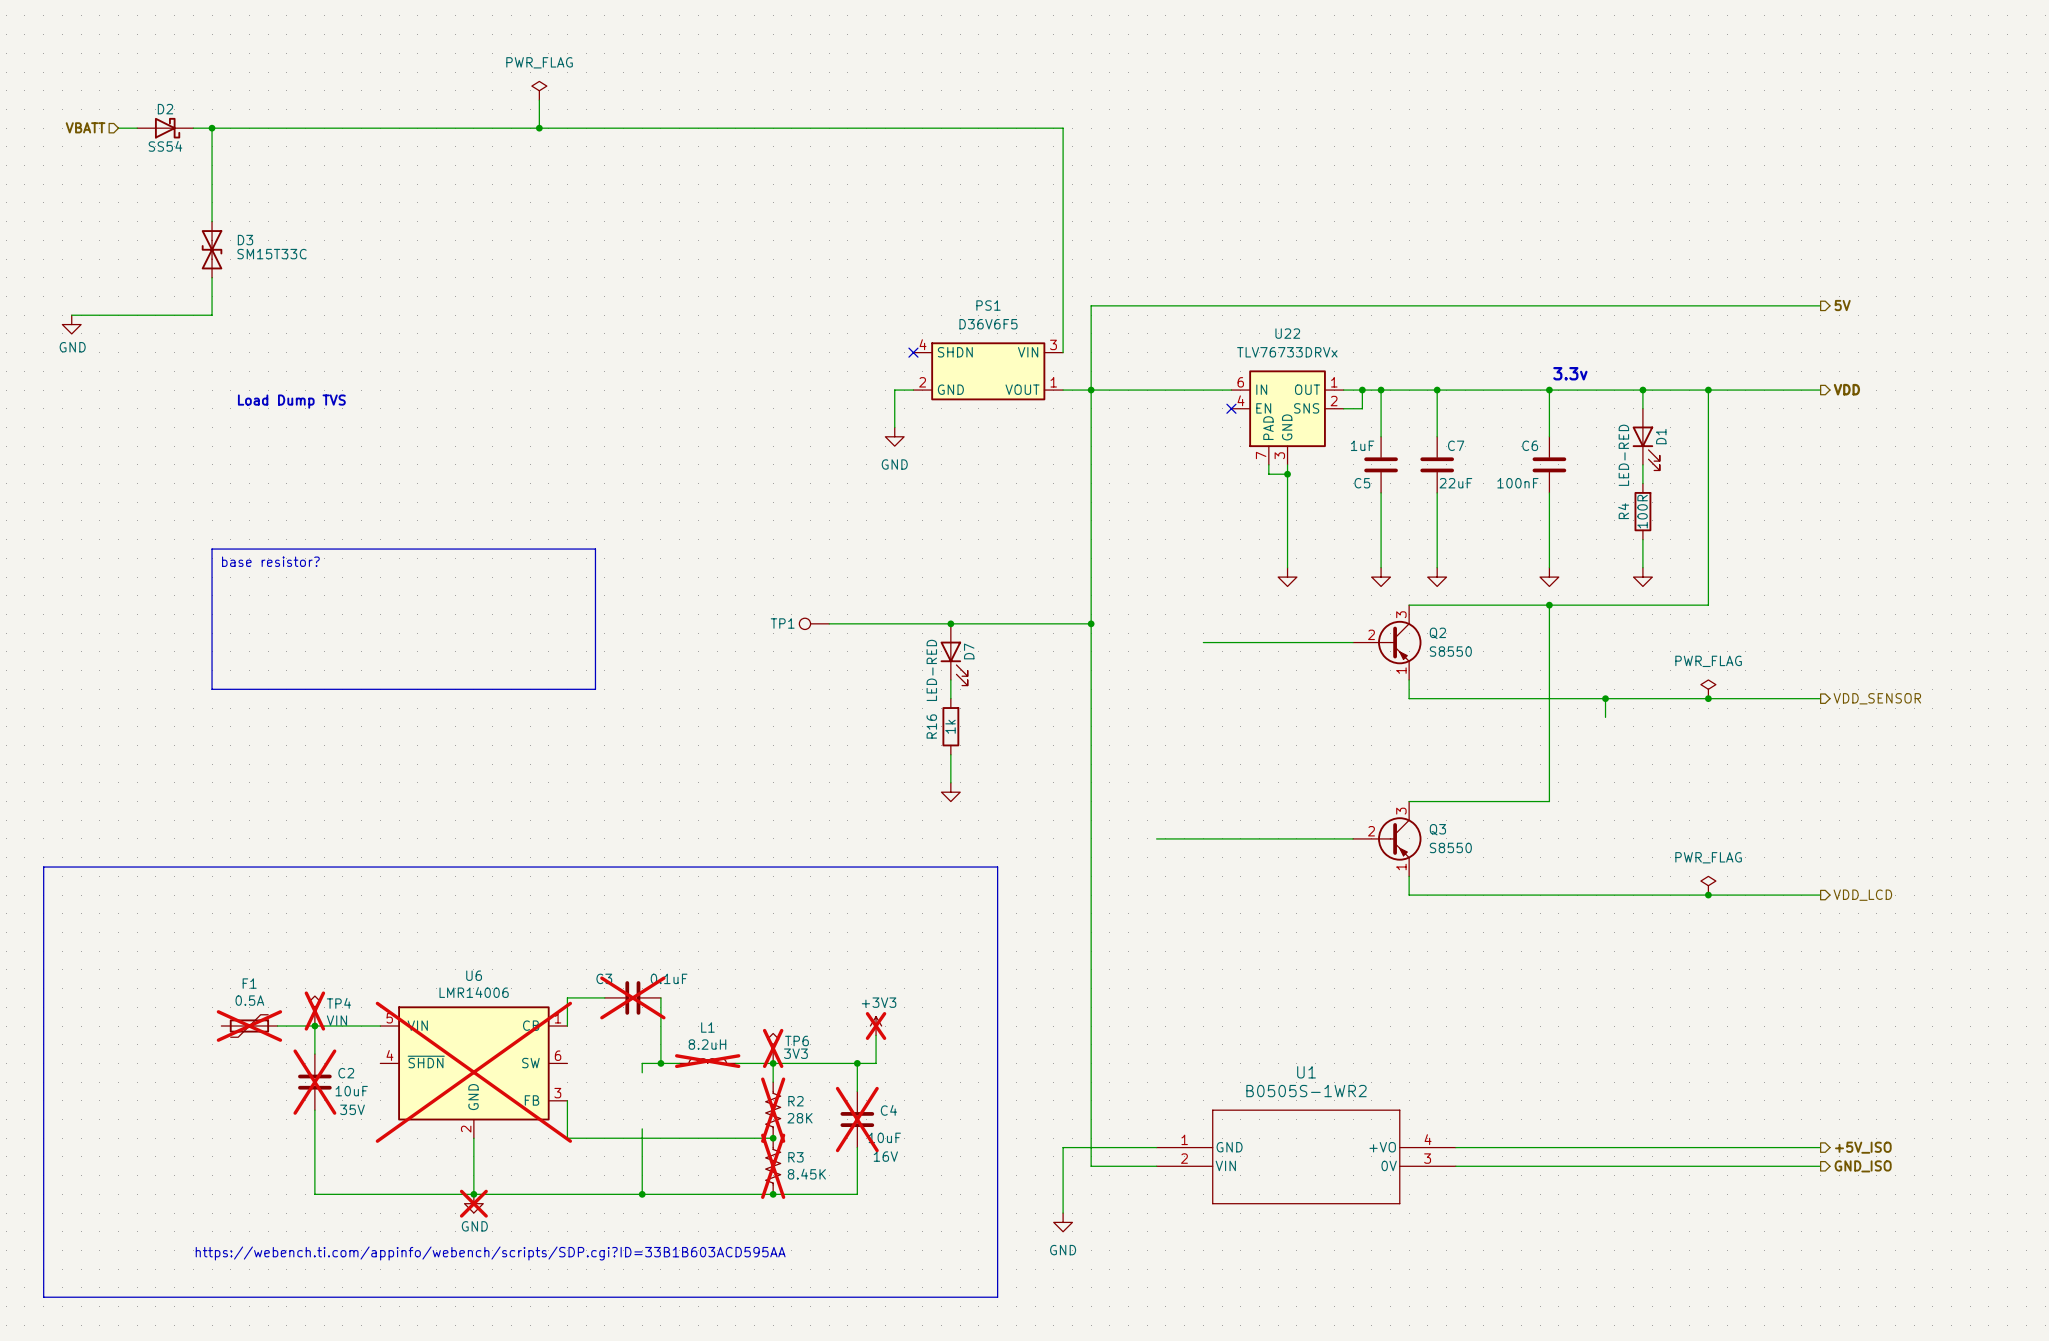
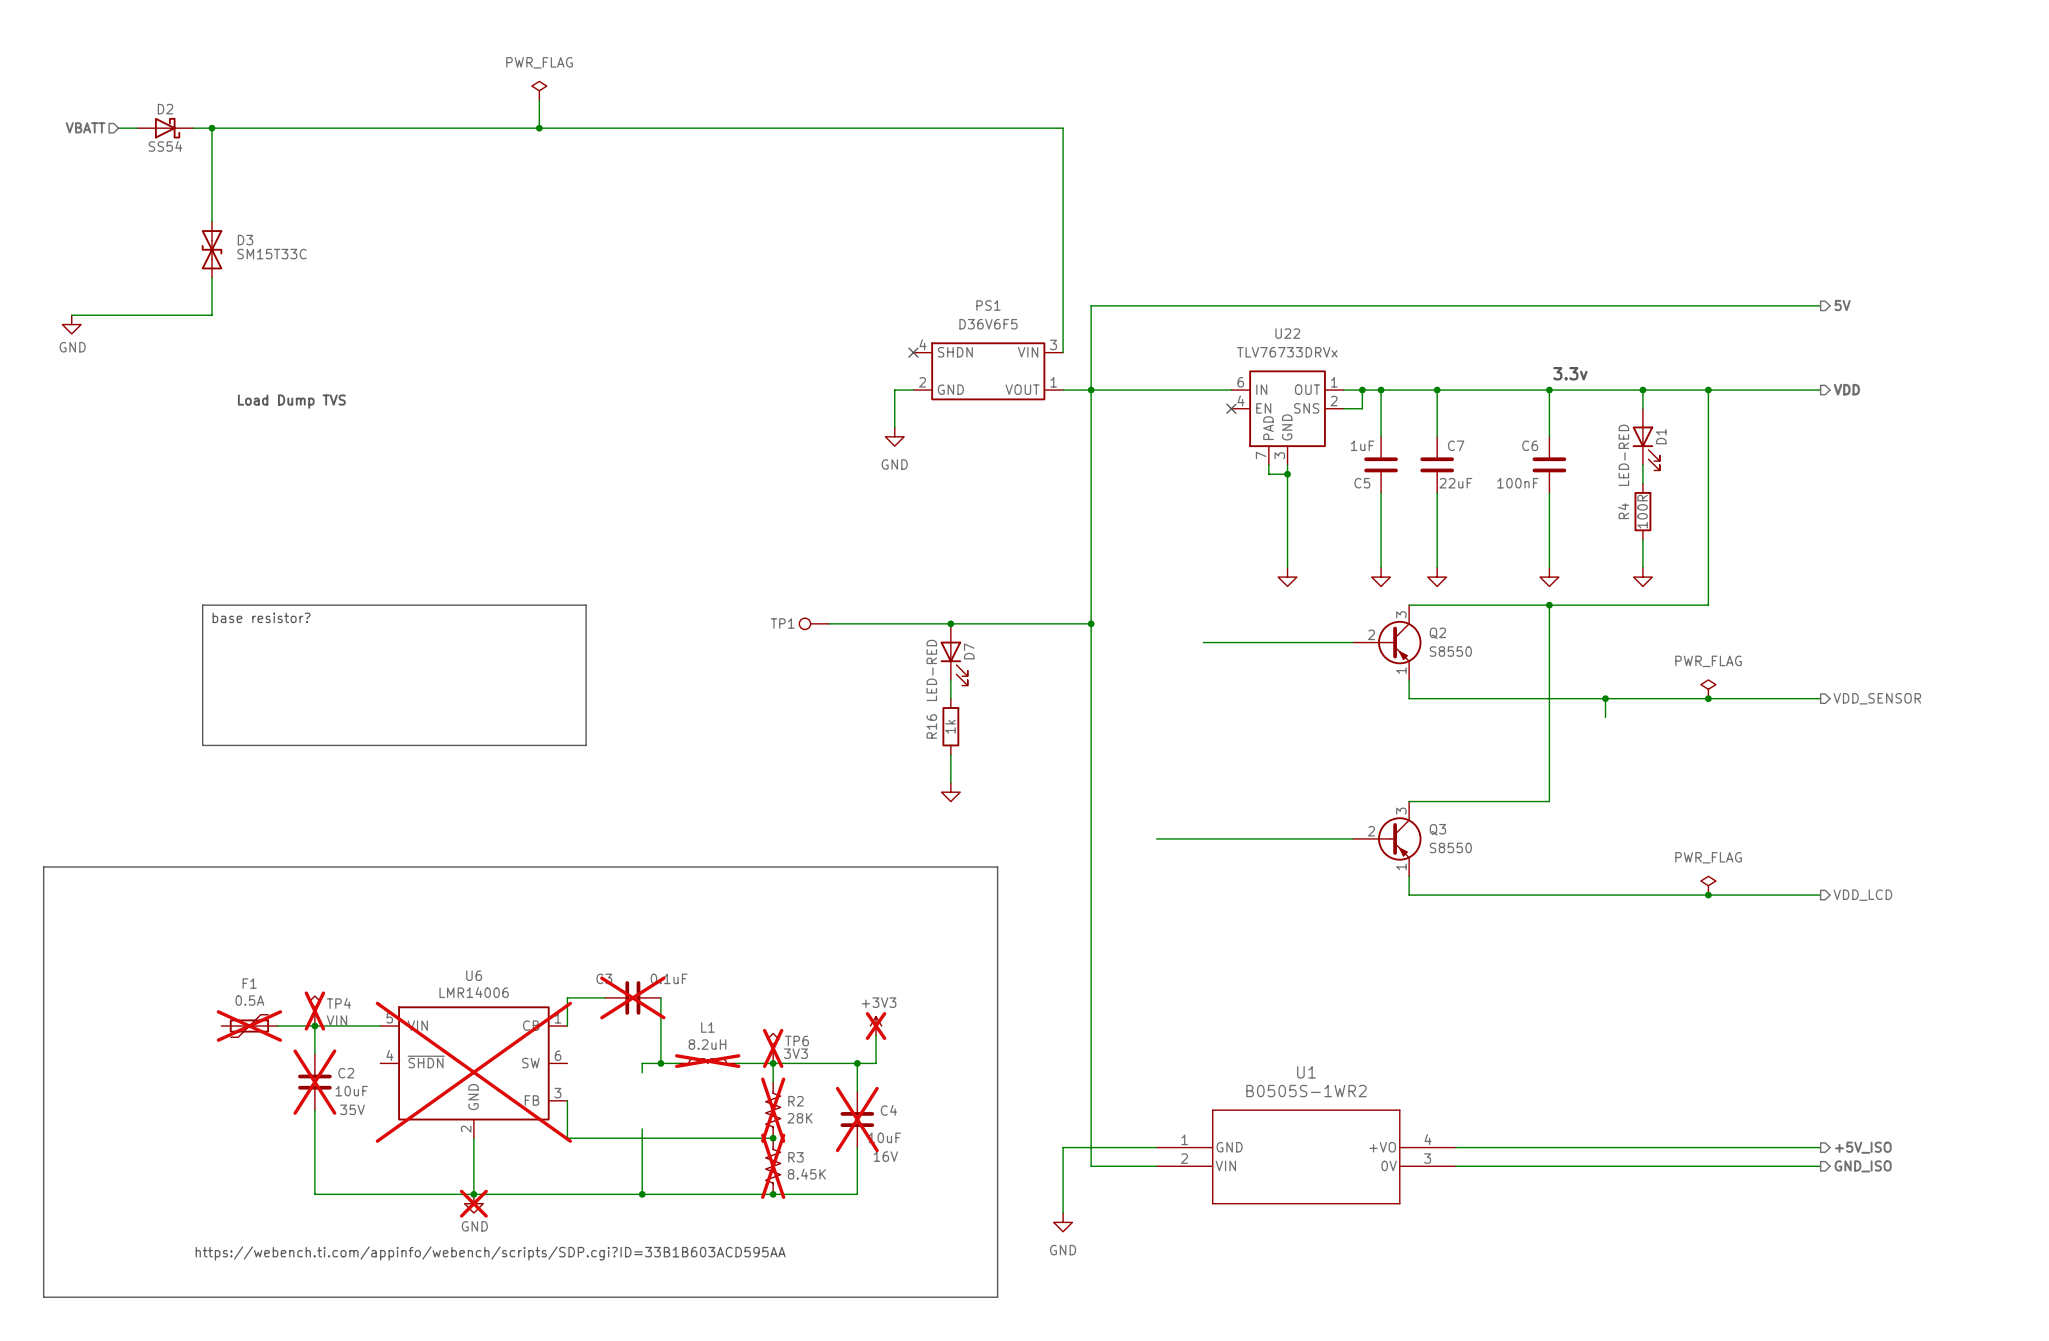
line: (212, 549) (595, 549) (595, 689) (212, 689) (212, 549) -> (202, 605) (586, 605) (586, 745) (202, 745) (202, 605)
text position: base resistor? (270, 561) -> base resistor? (261, 617)

